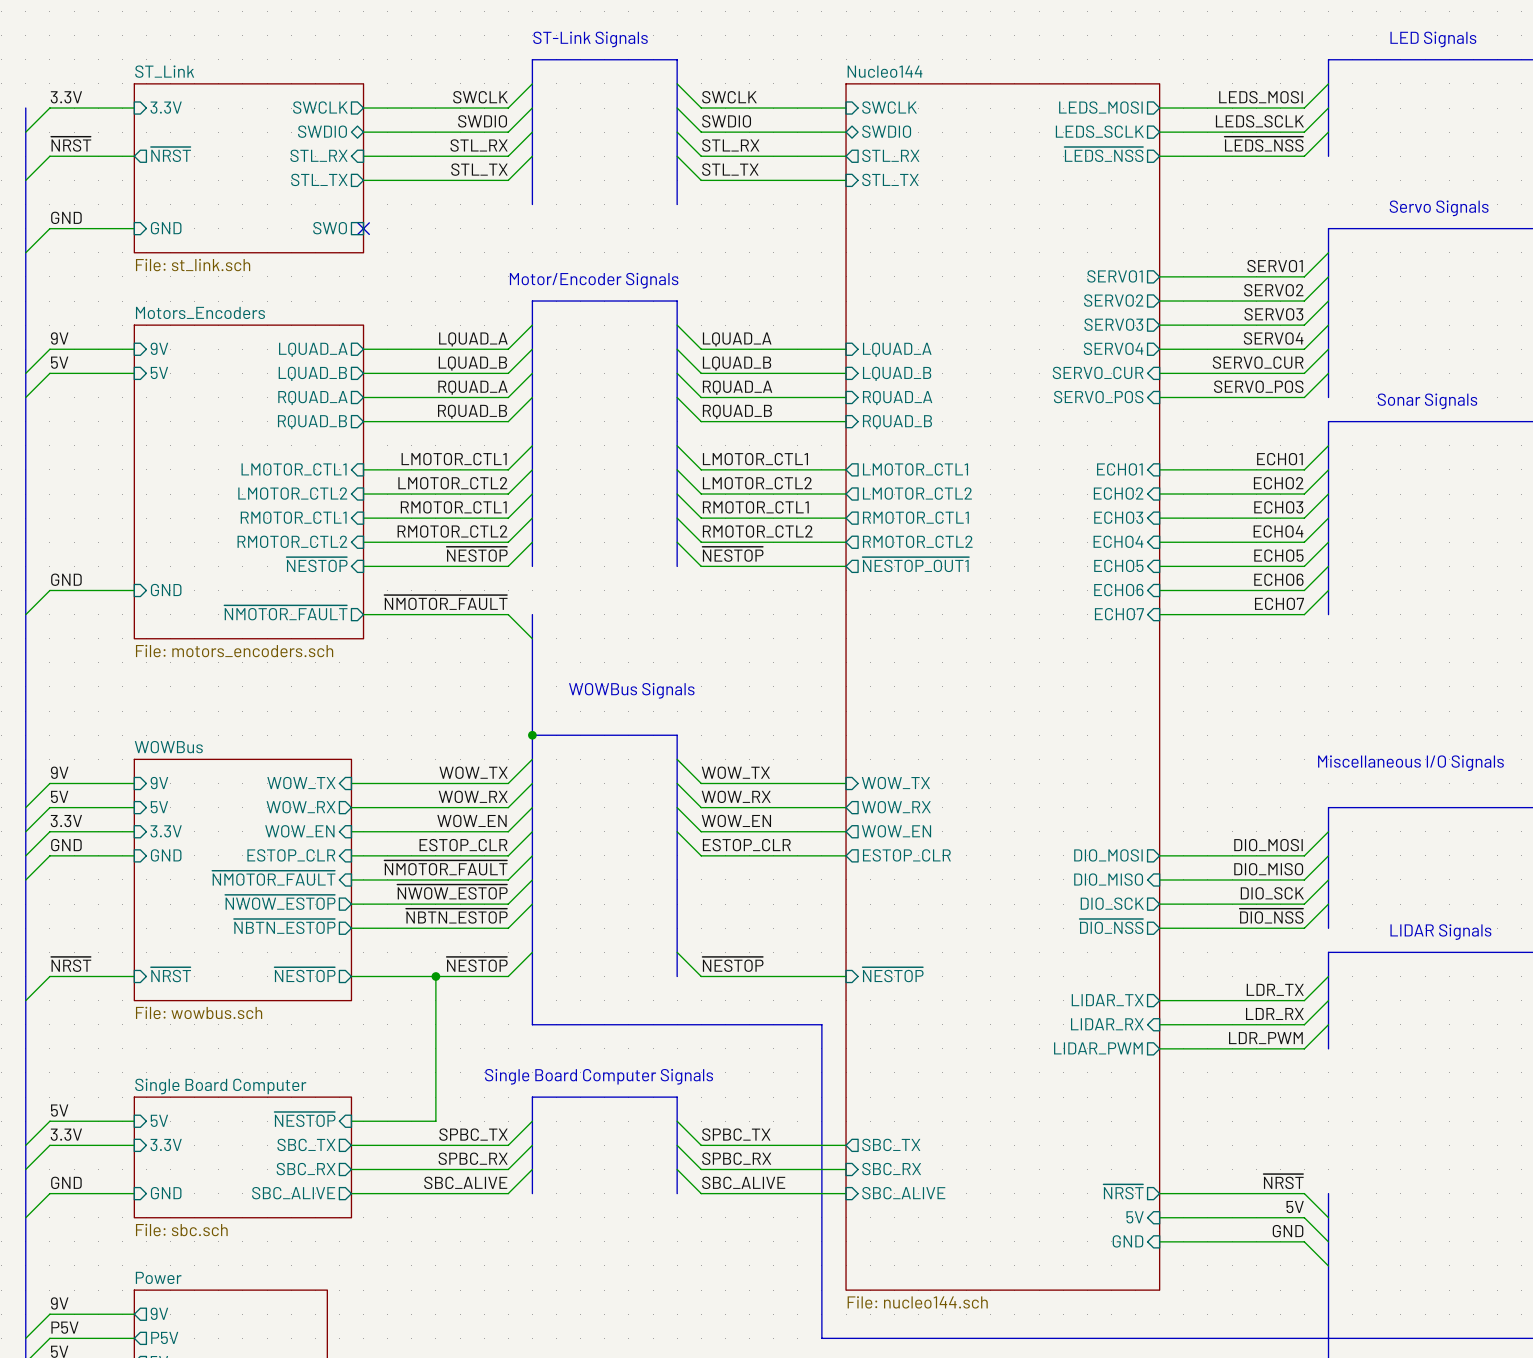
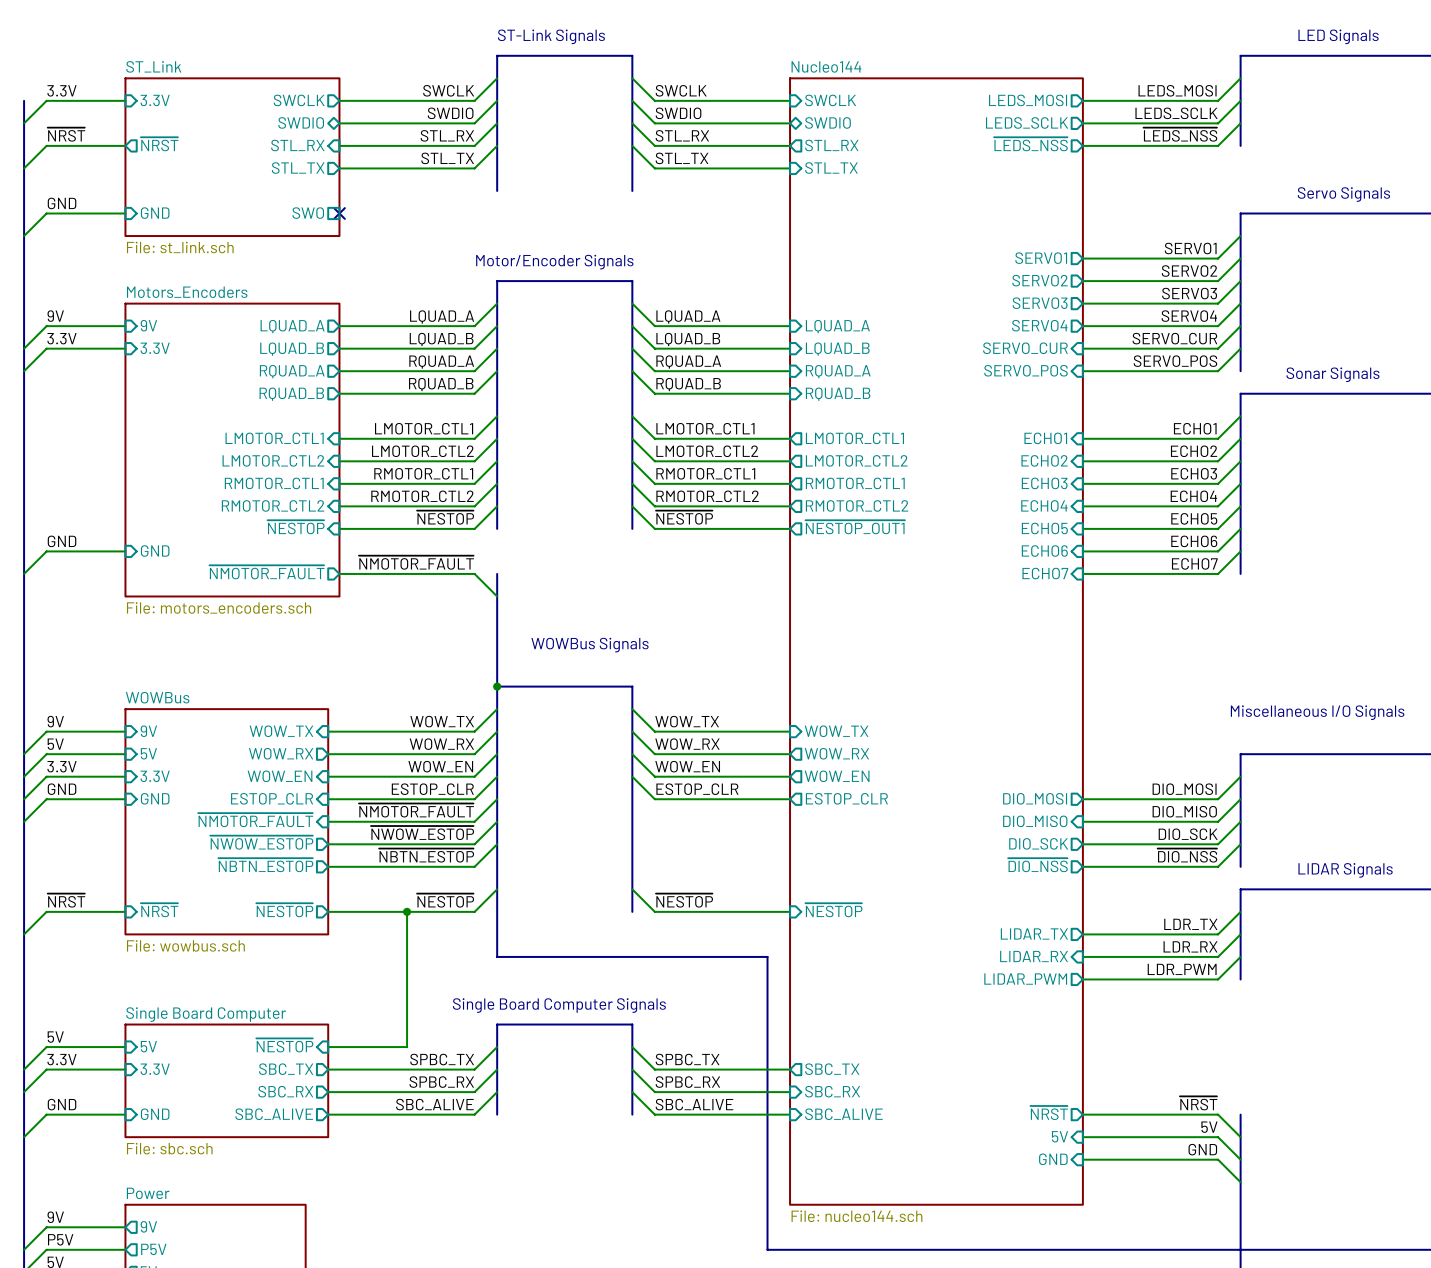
label: 5V (59, 362) -> 3.3V (62, 338)
sheet pin: 5V (159, 372) -> 3.3V (155, 348)

